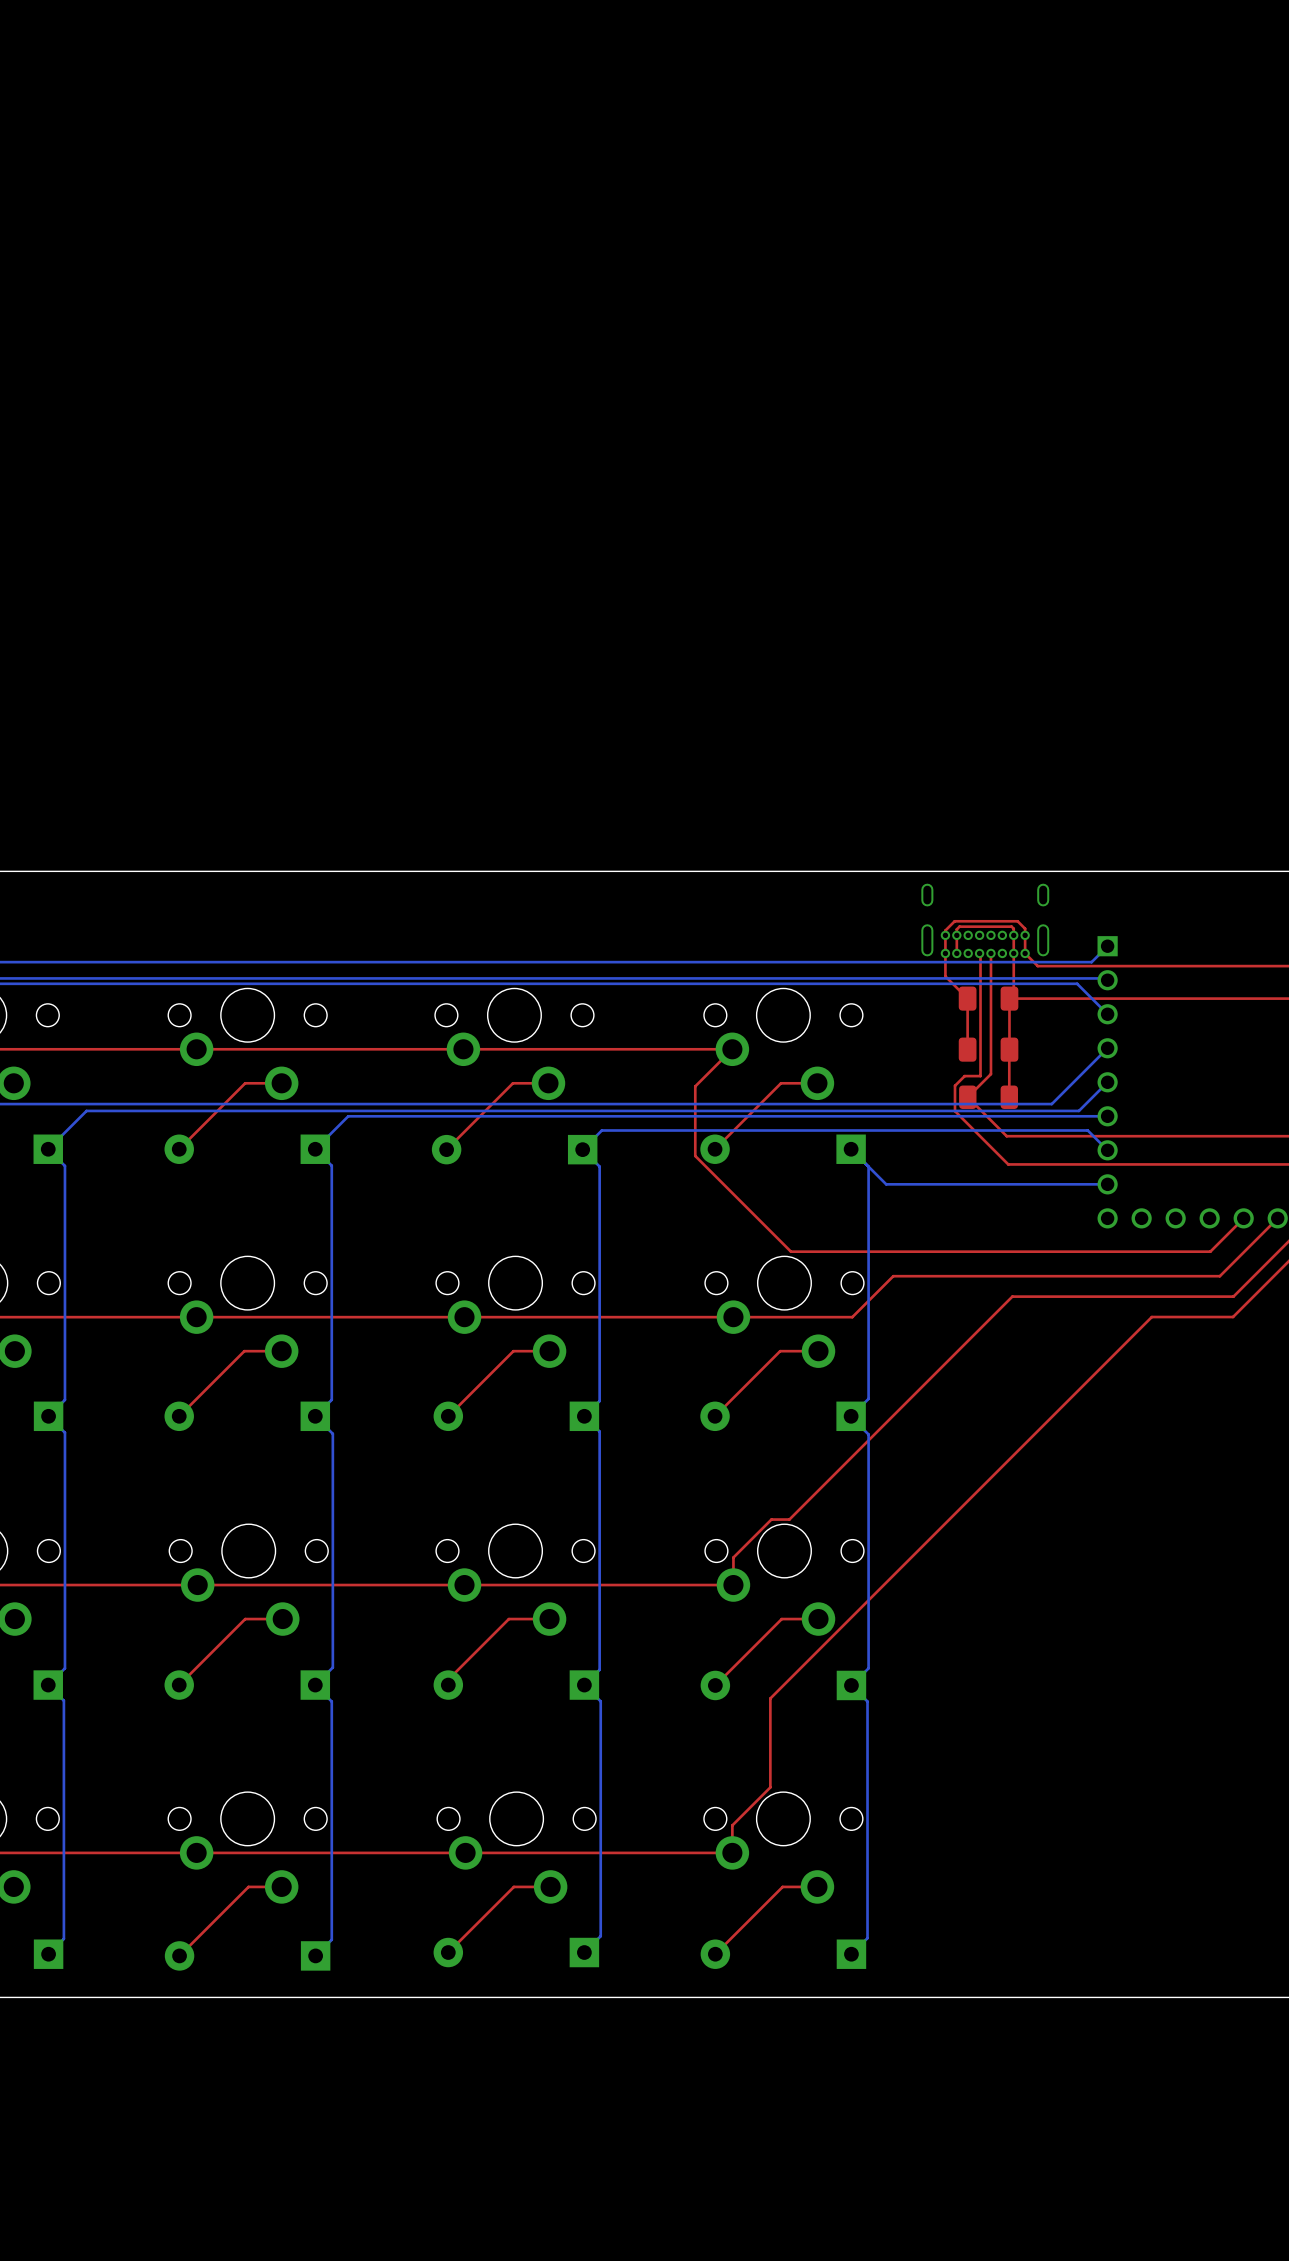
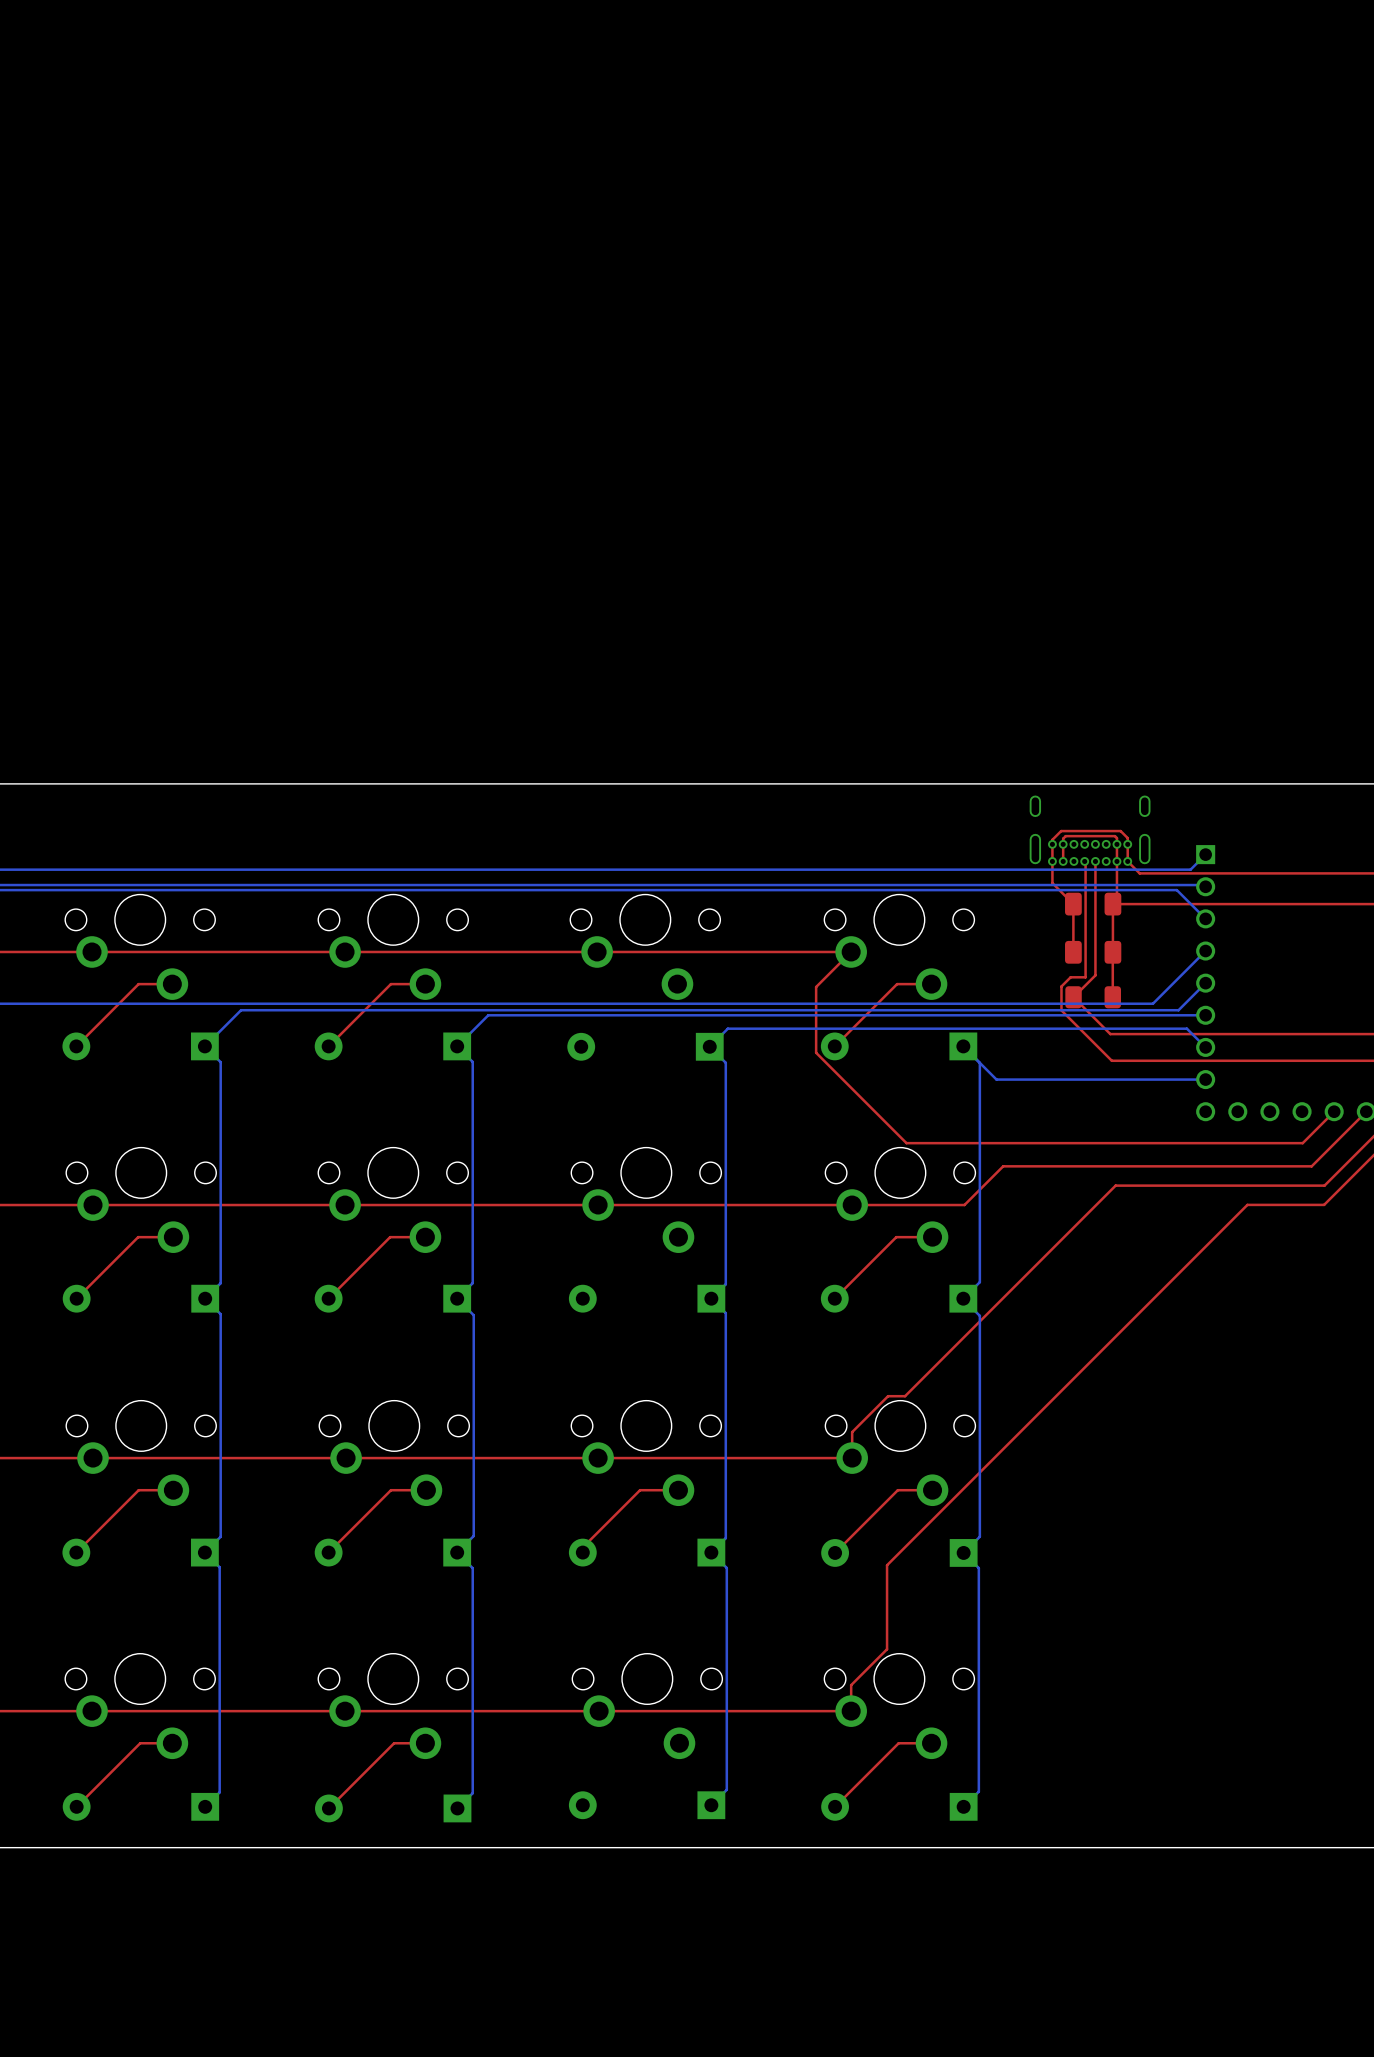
top track: (548, 1083) (512, 1083) (446, 1149) -> none
top track: (549, 1351) (513, 1351) (448, 1416) -> none
top track: (550, 1886) (513, 1886) (448, 1952) -> none

